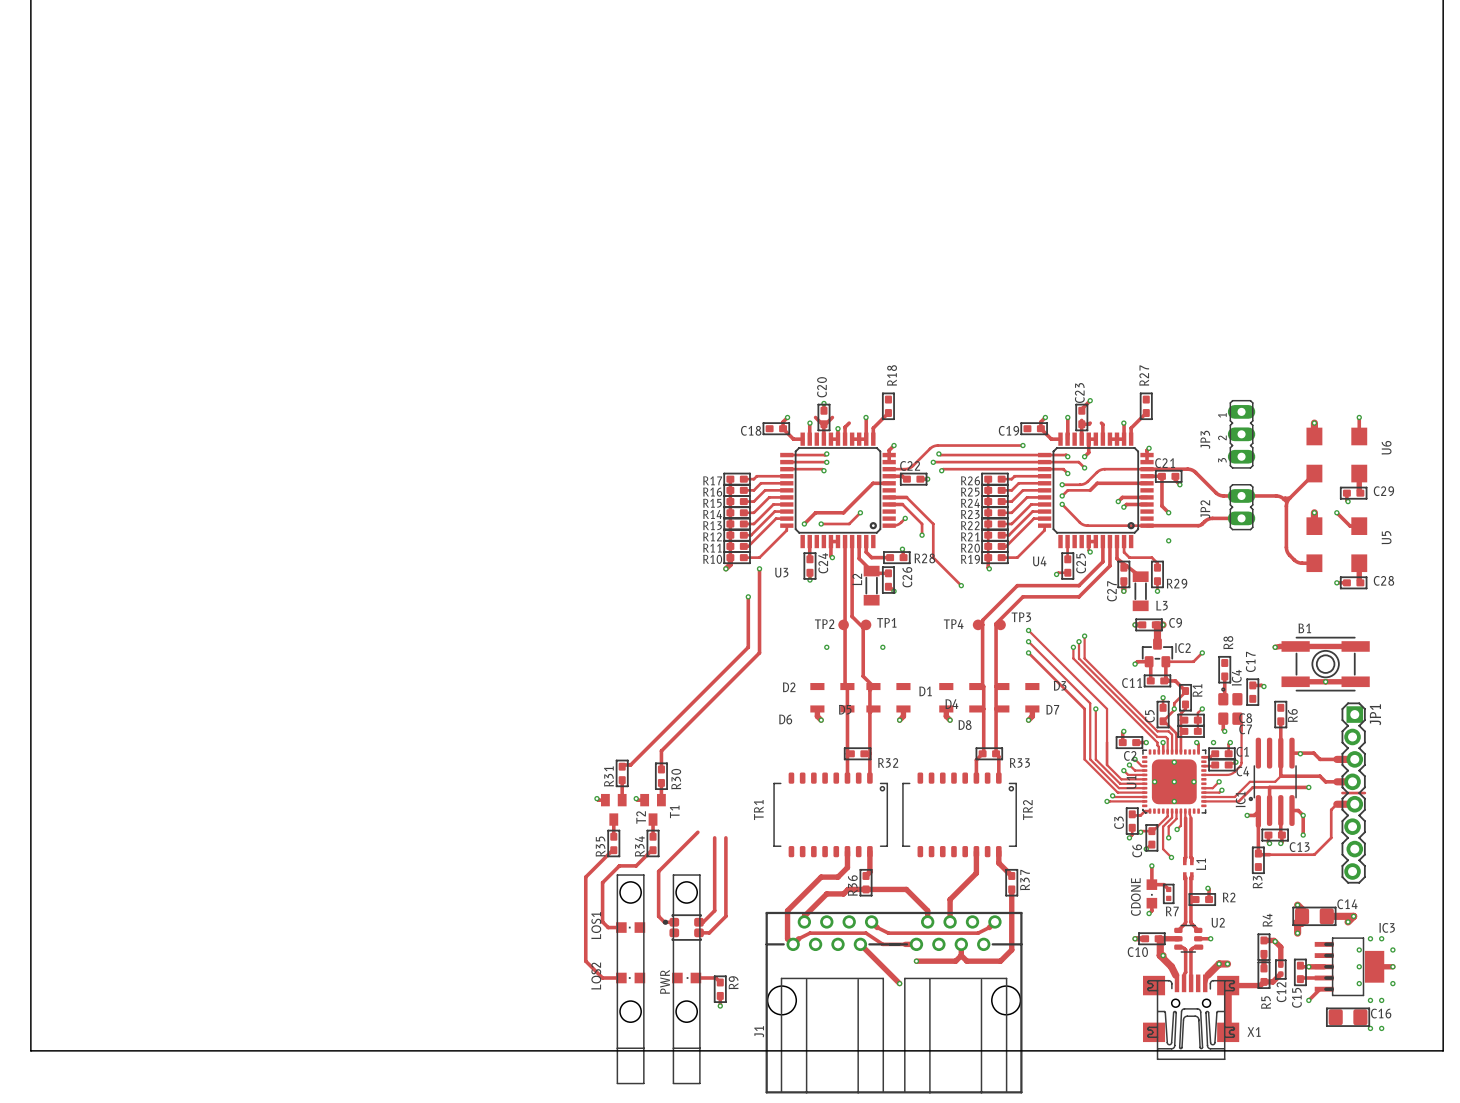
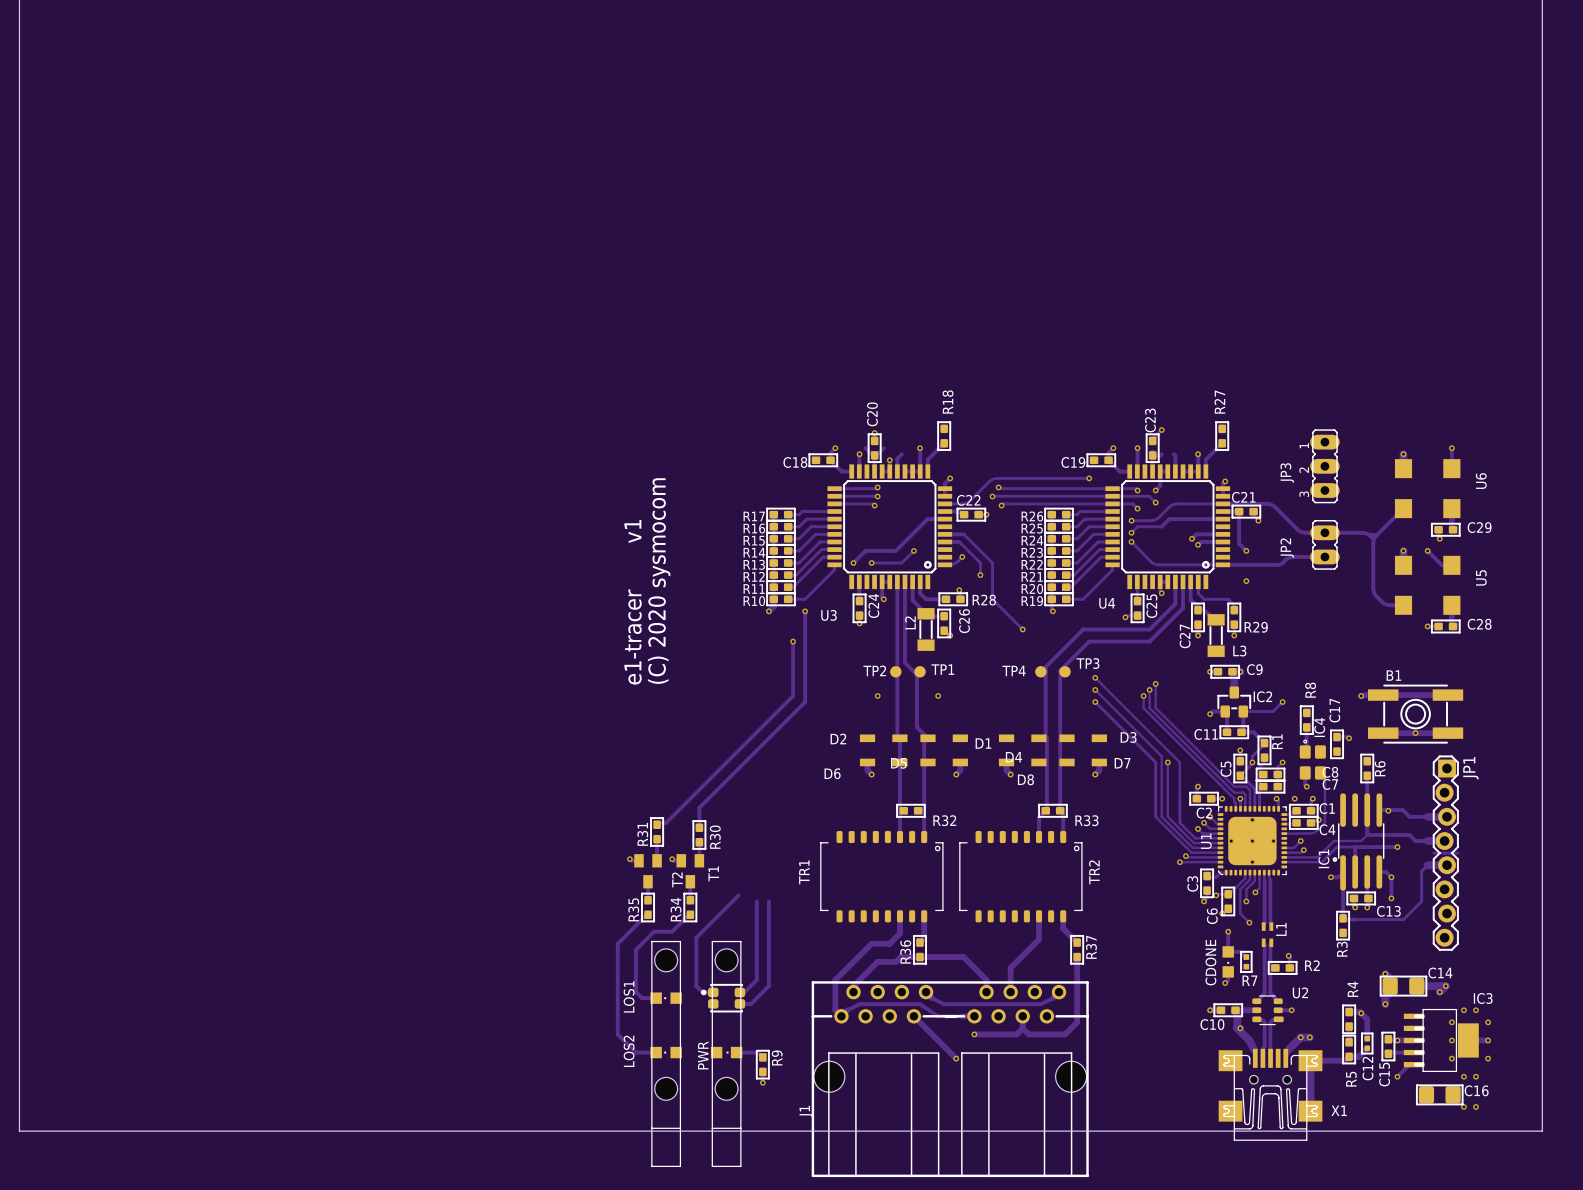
text: none -> v1 (632, 531)
text: none -> (C) 2020 sysmocom (659, 581)
text: none -> e1-tracer (633, 637)

